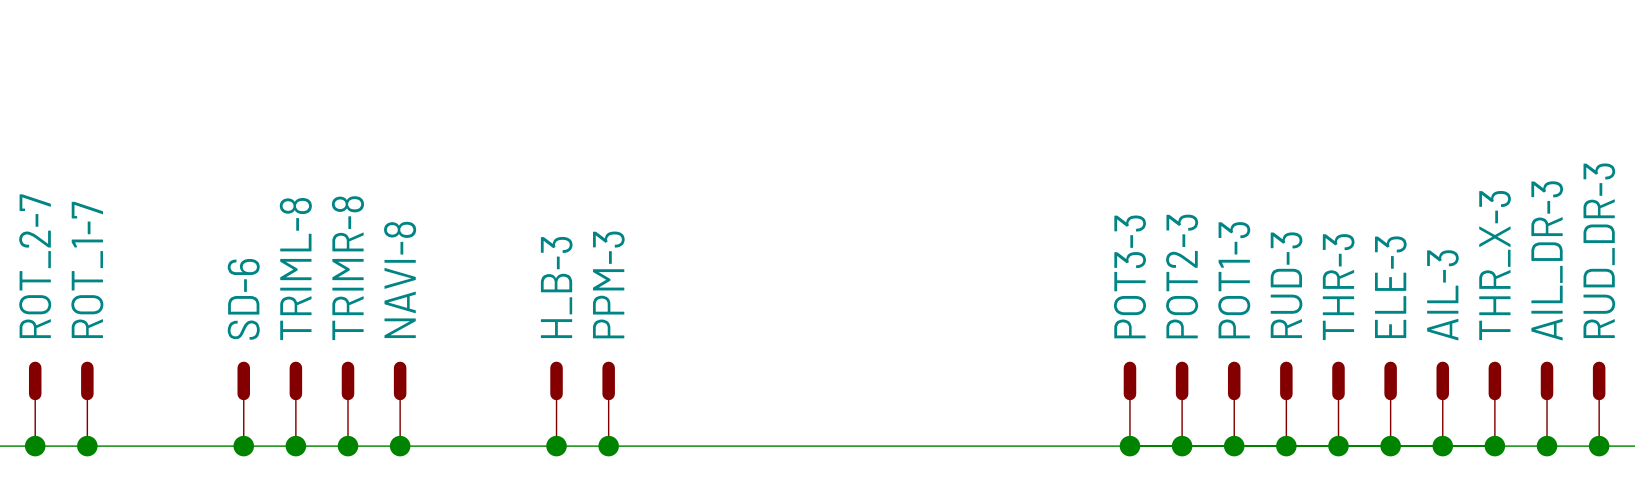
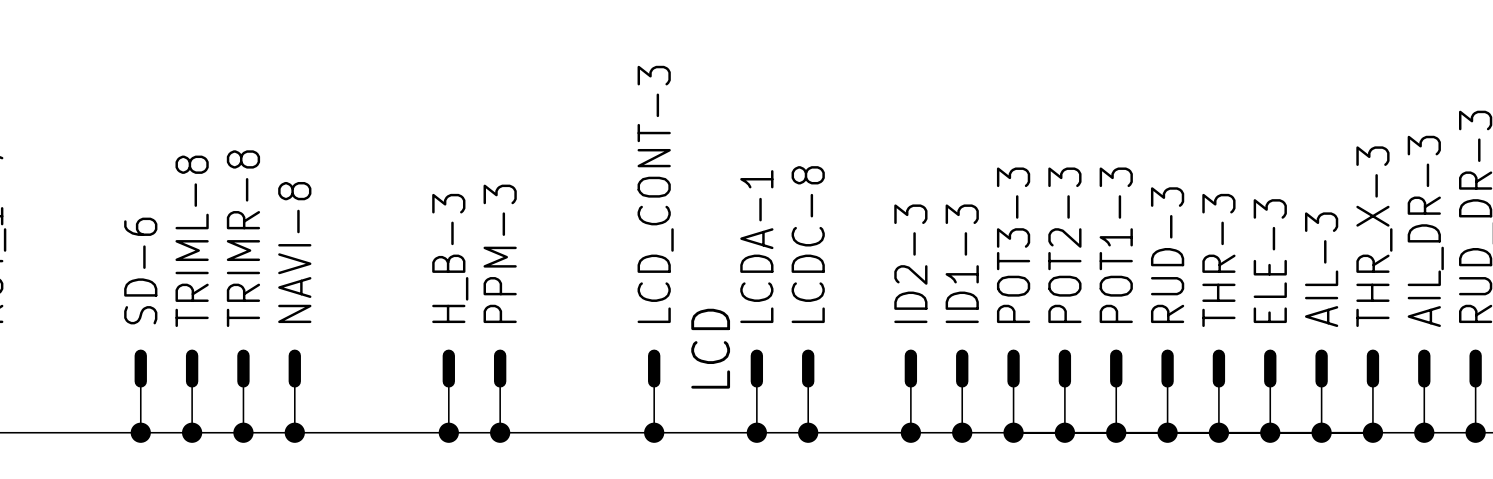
LCD_CONT-3: none -> (654, 391)
LCDA-1: none -> LCD (756, 391)
LCDC-8: none -> (808, 391)
ID2-3: none -> (910, 391)
ID1-3: none -> (962, 391)
junction: none -> (654, 432)
junction: none -> (756, 432)
junction: none -> (808, 432)
junction: none -> (910, 432)
junction: none -> (962, 432)

